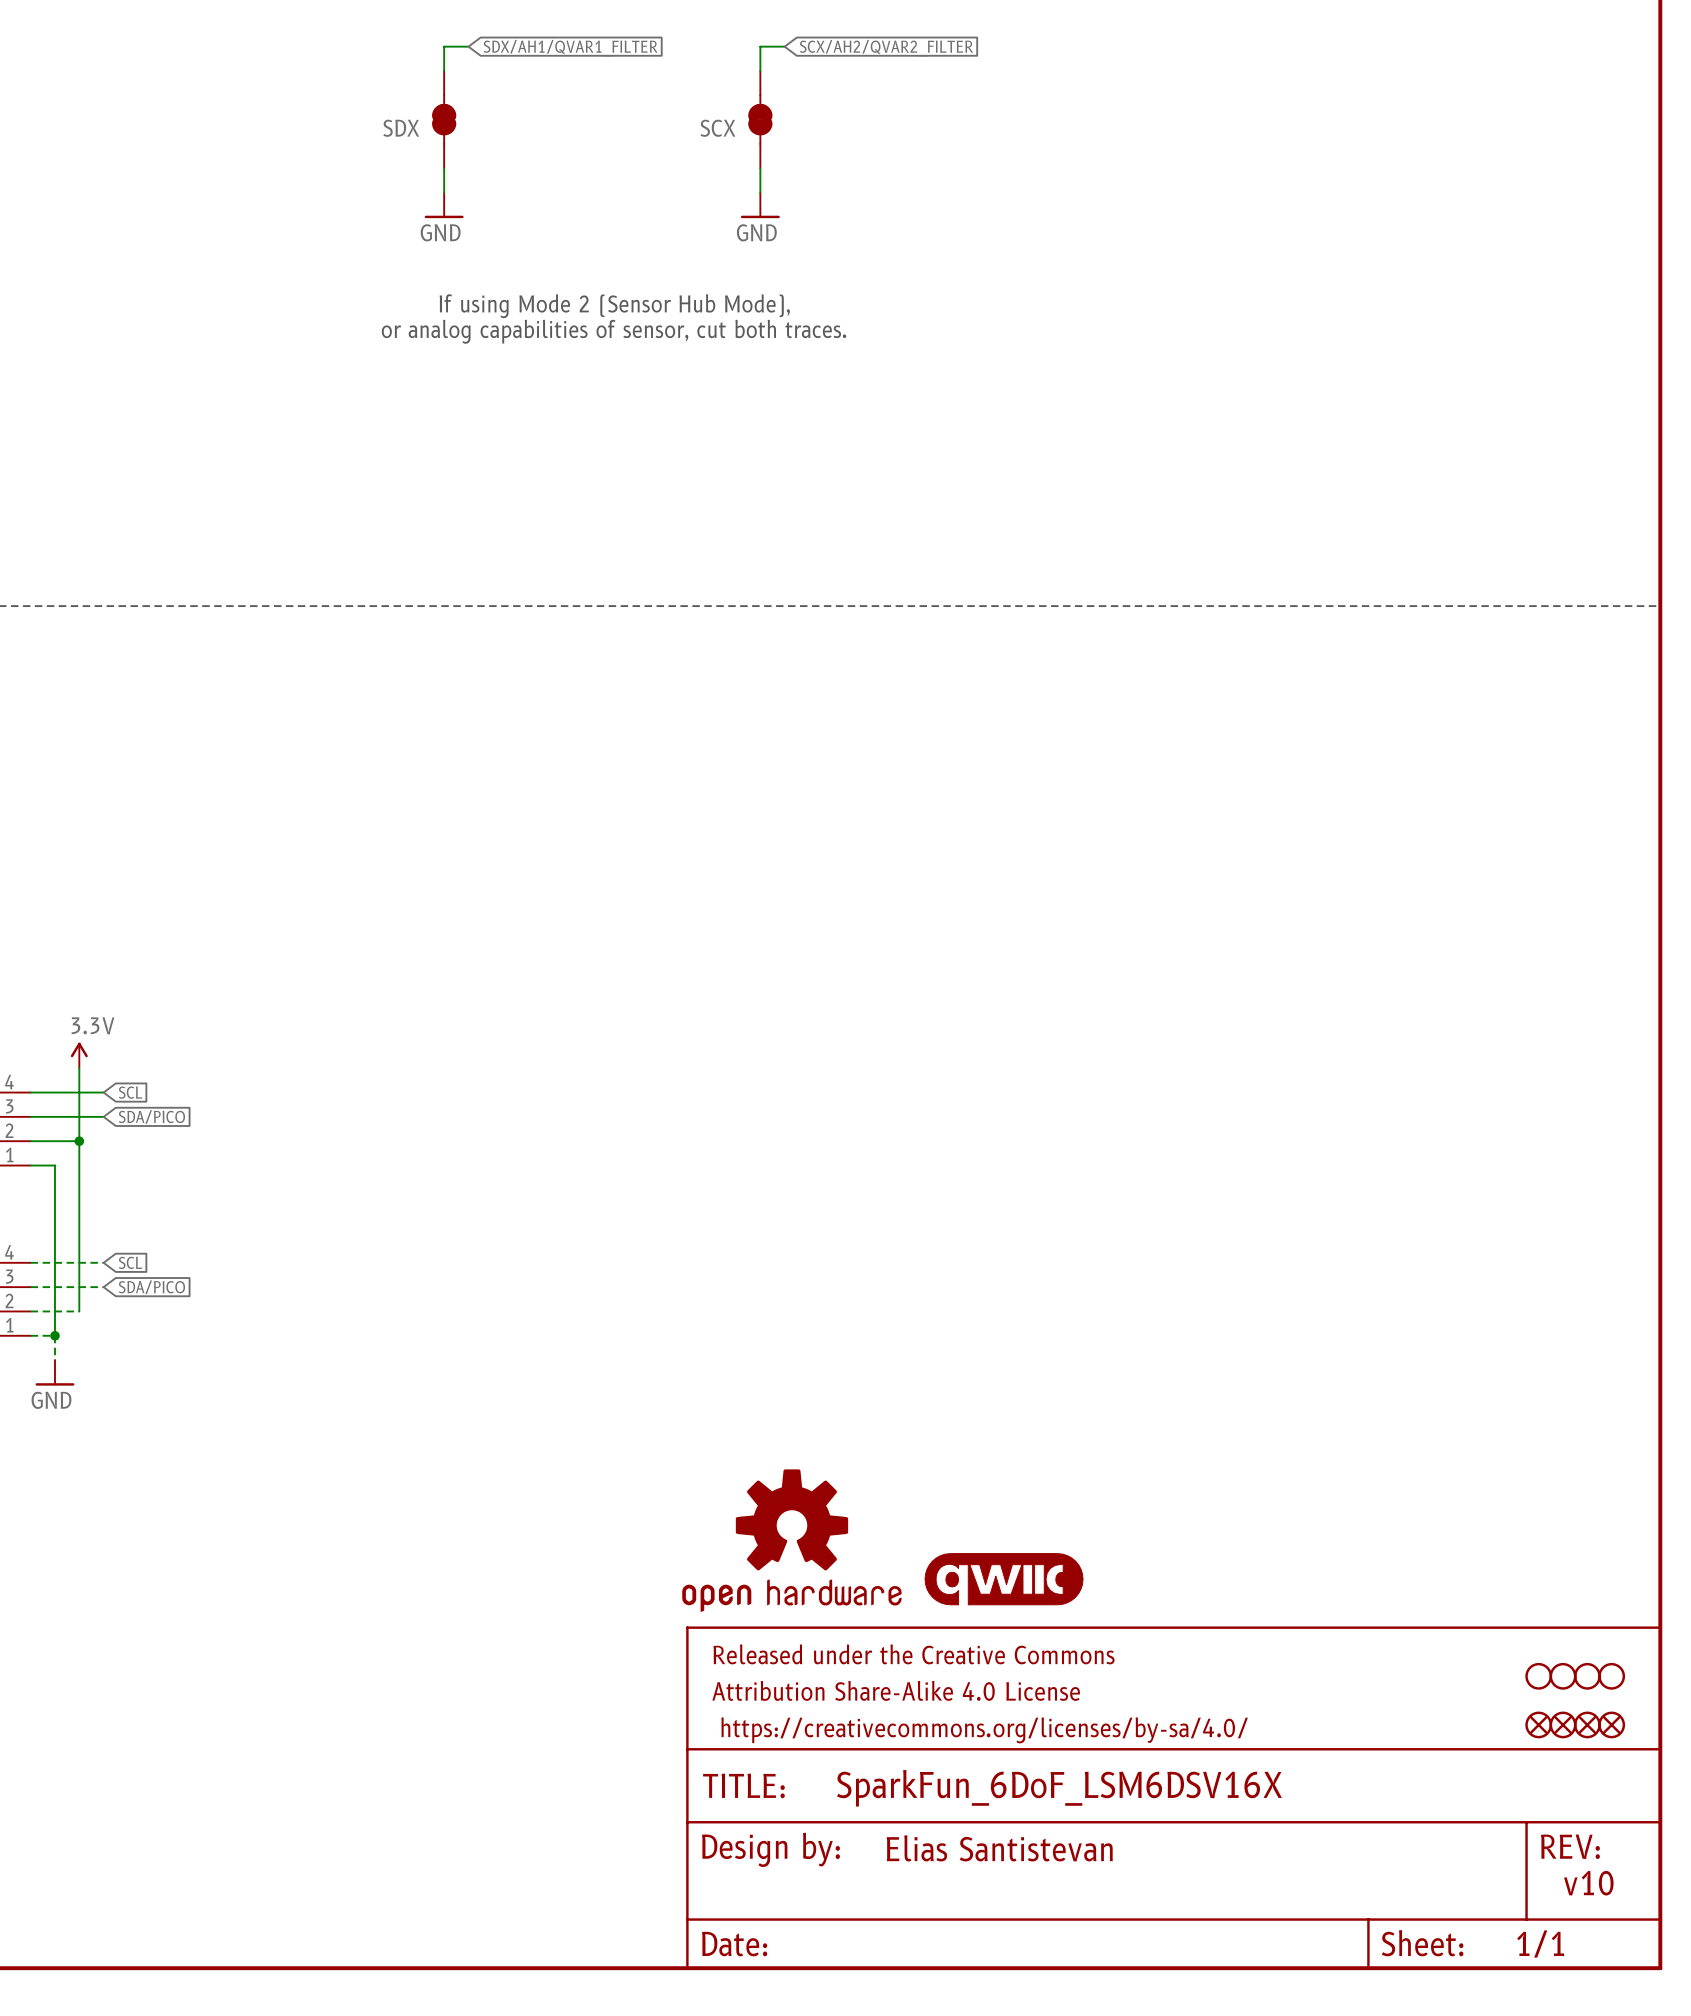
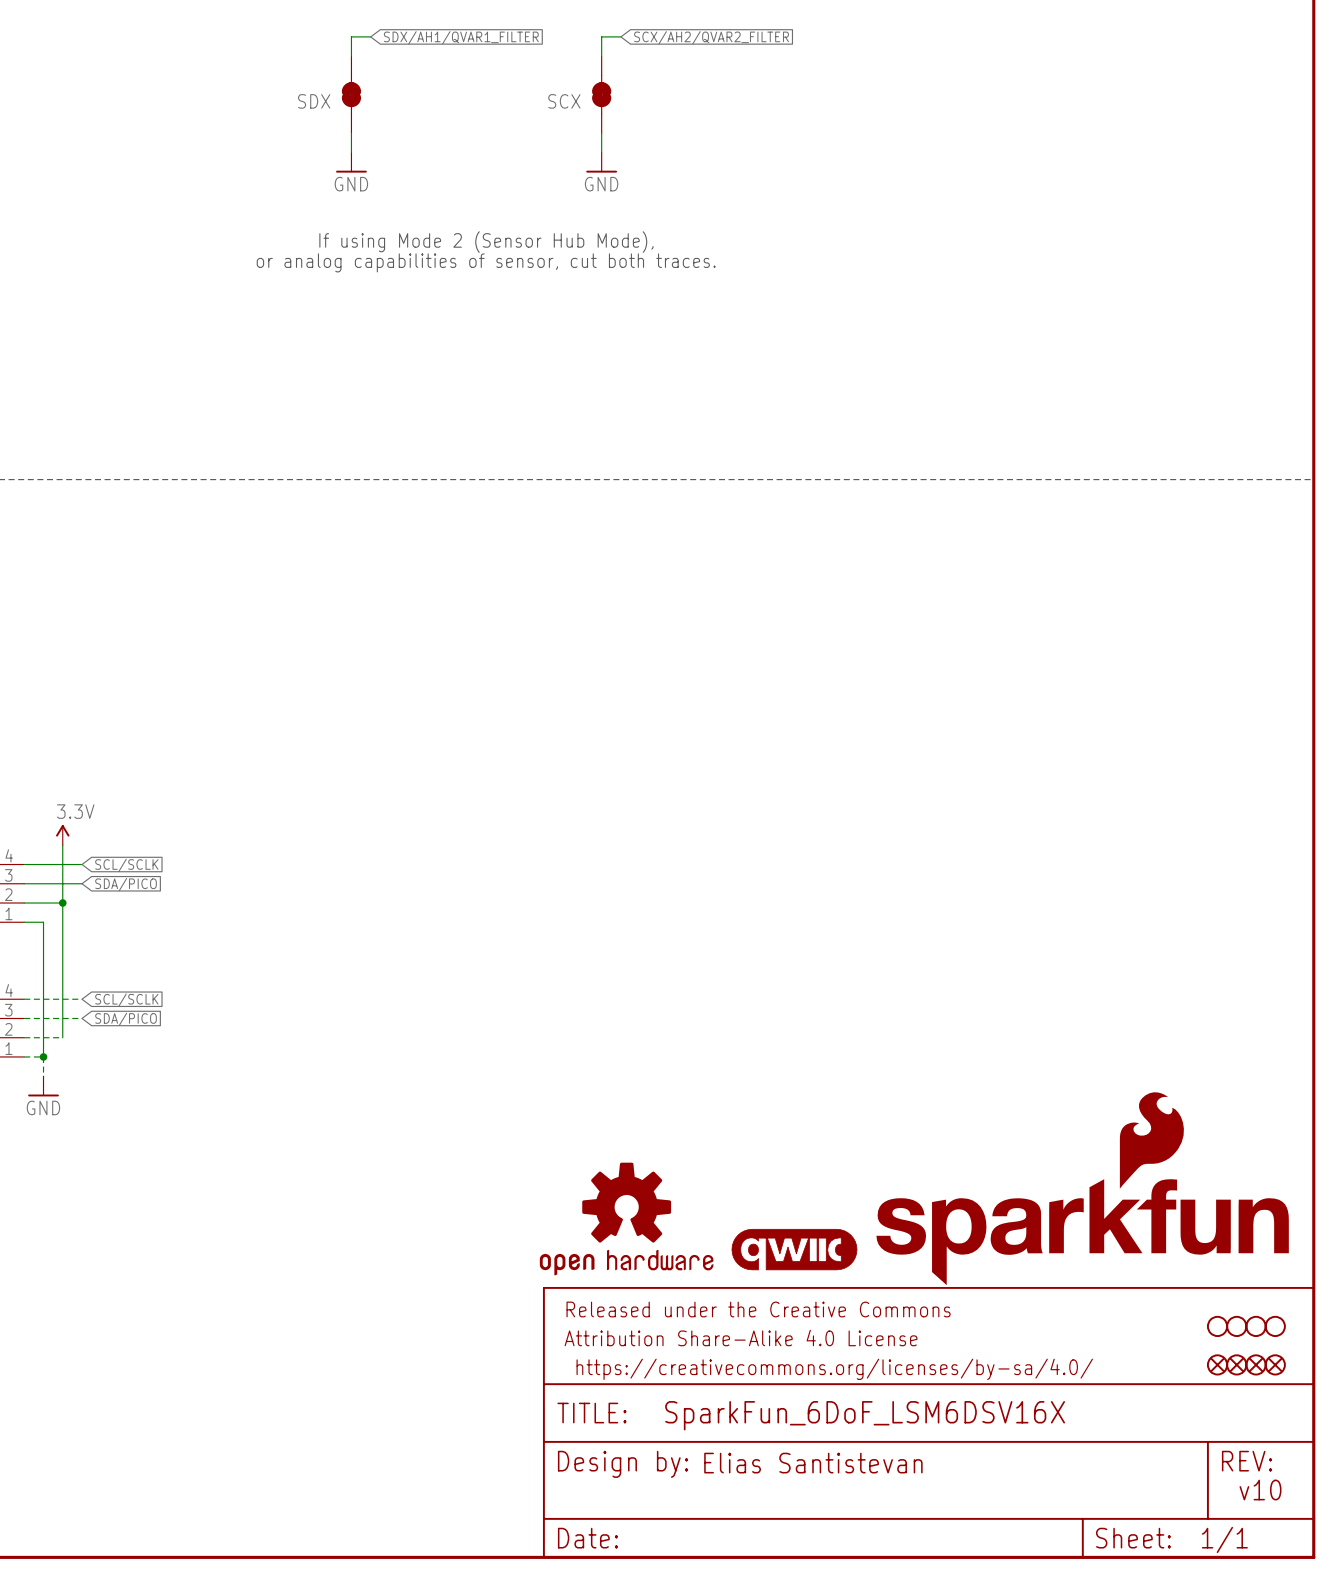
global label: SCL (130, 1092) -> SCL/SCLK (126, 865)
global label: SCL (130, 1262) -> SCL/SCLK (126, 1000)
part: none -> (1082, 1188)

